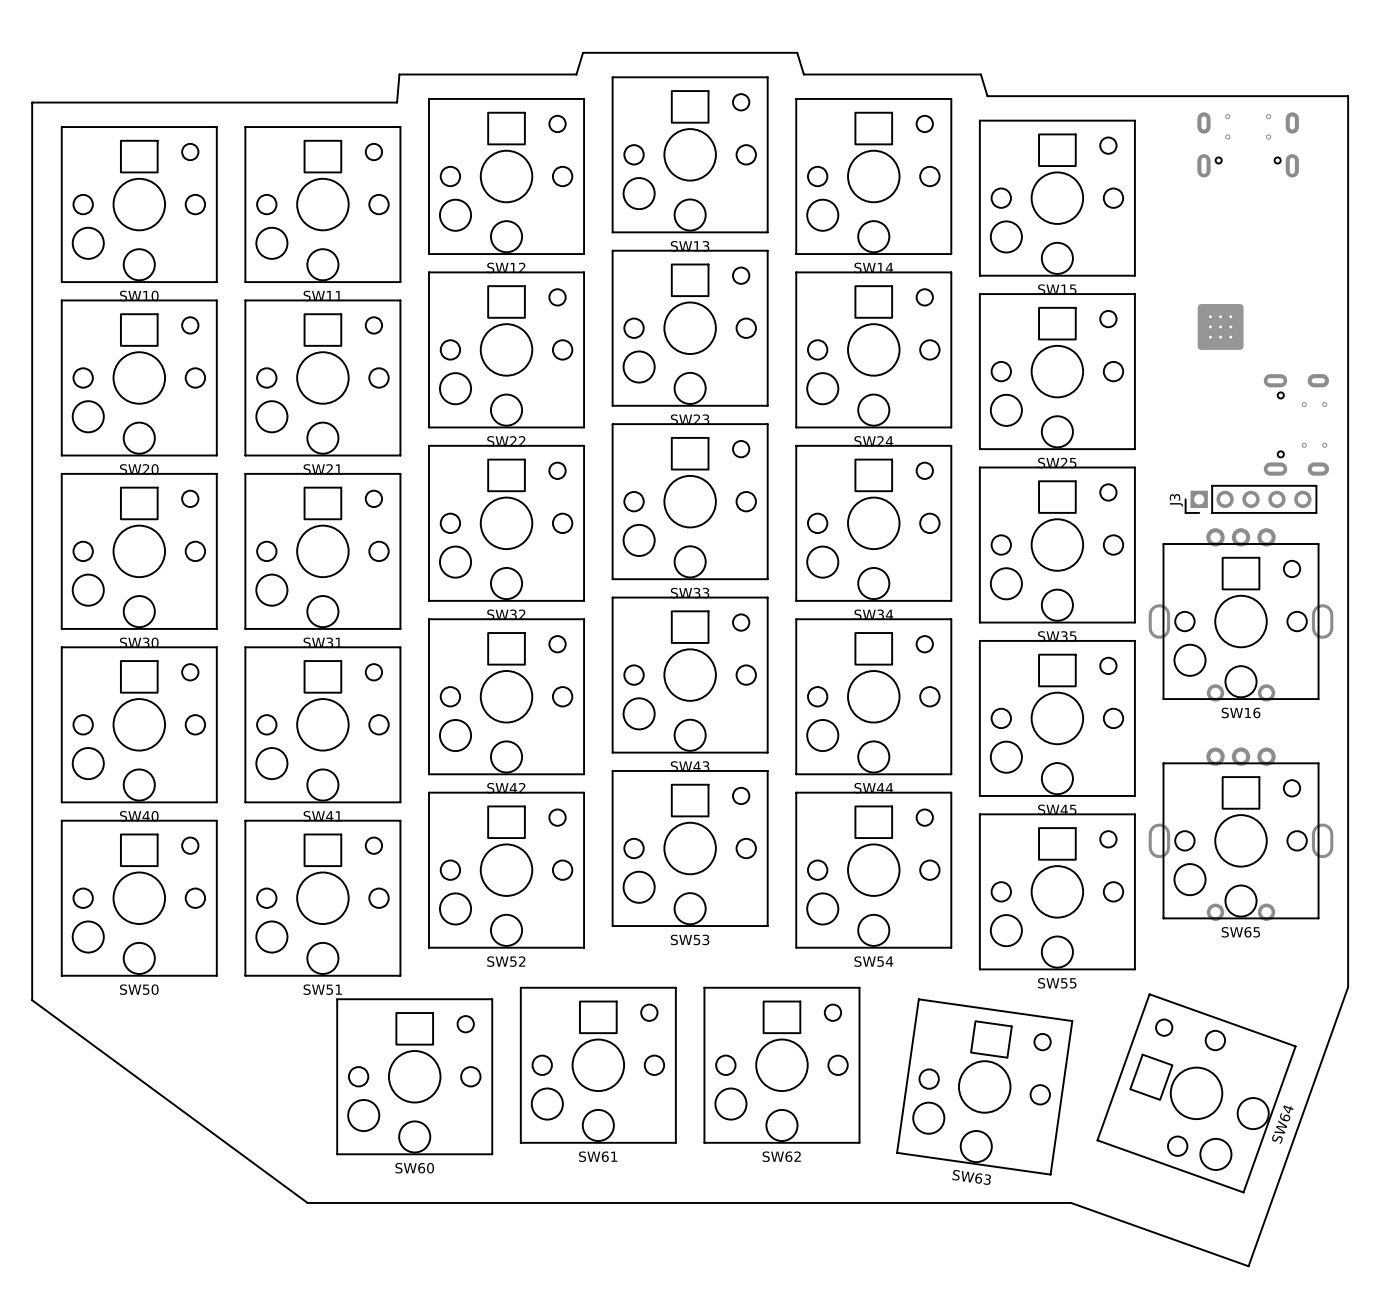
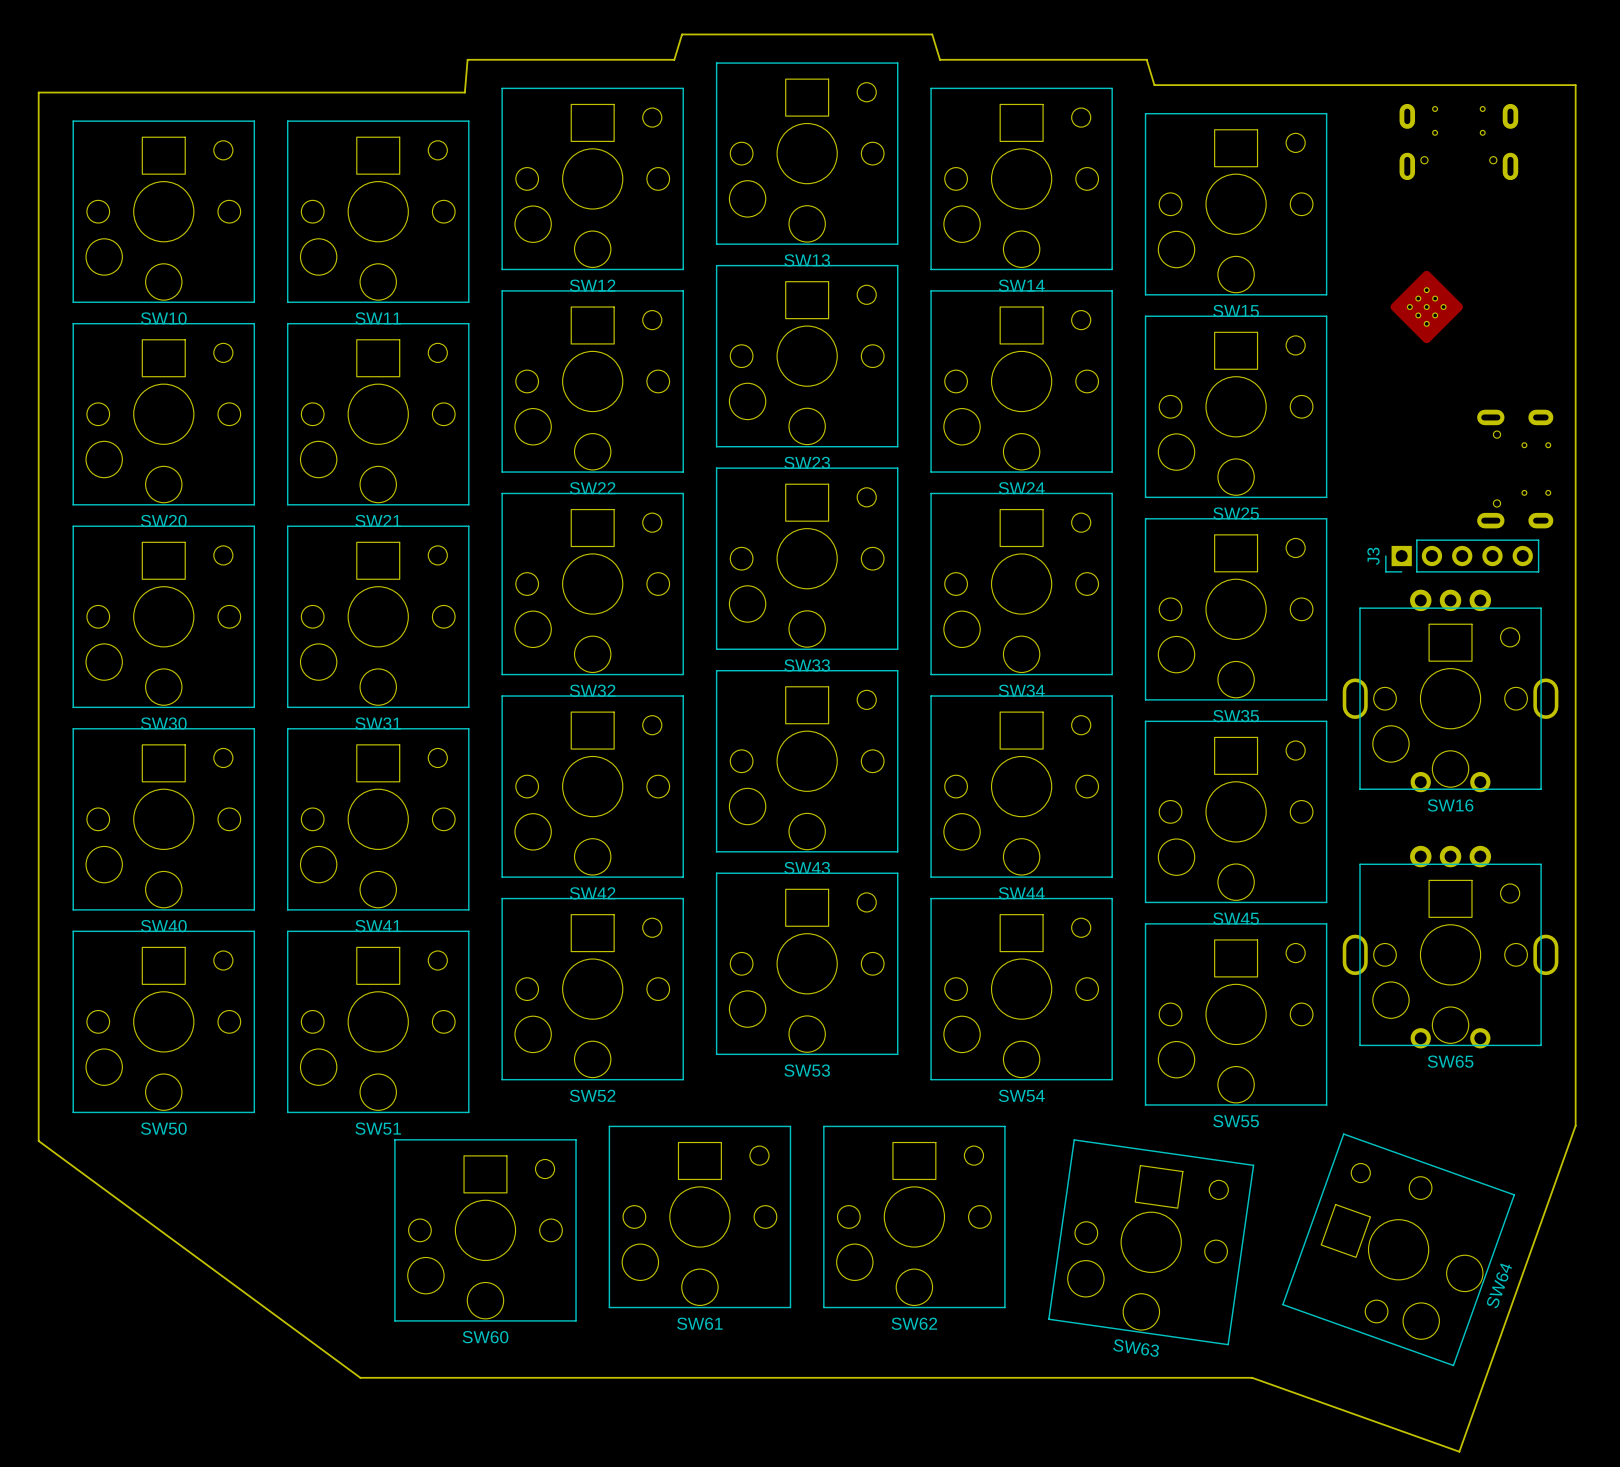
part: none -> (1426, 307)
part: (1220, 326) -> none

